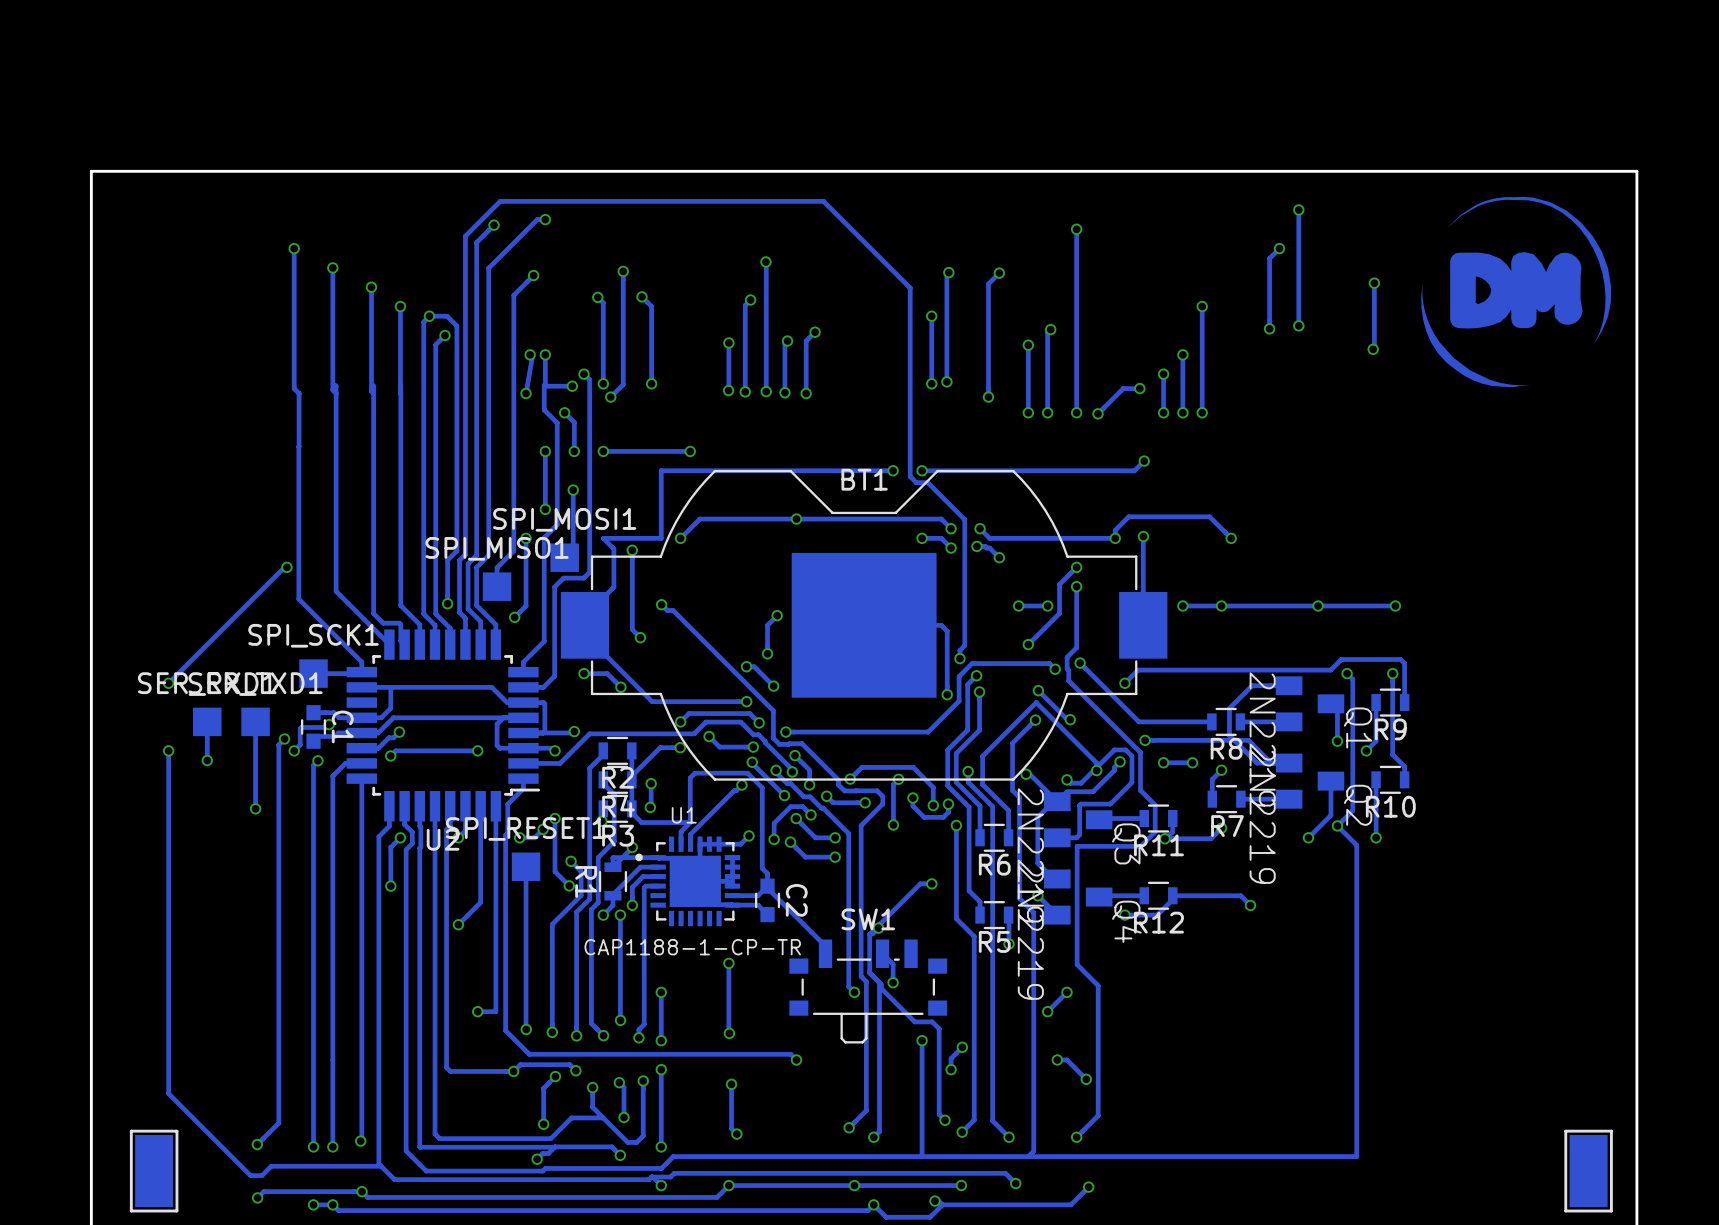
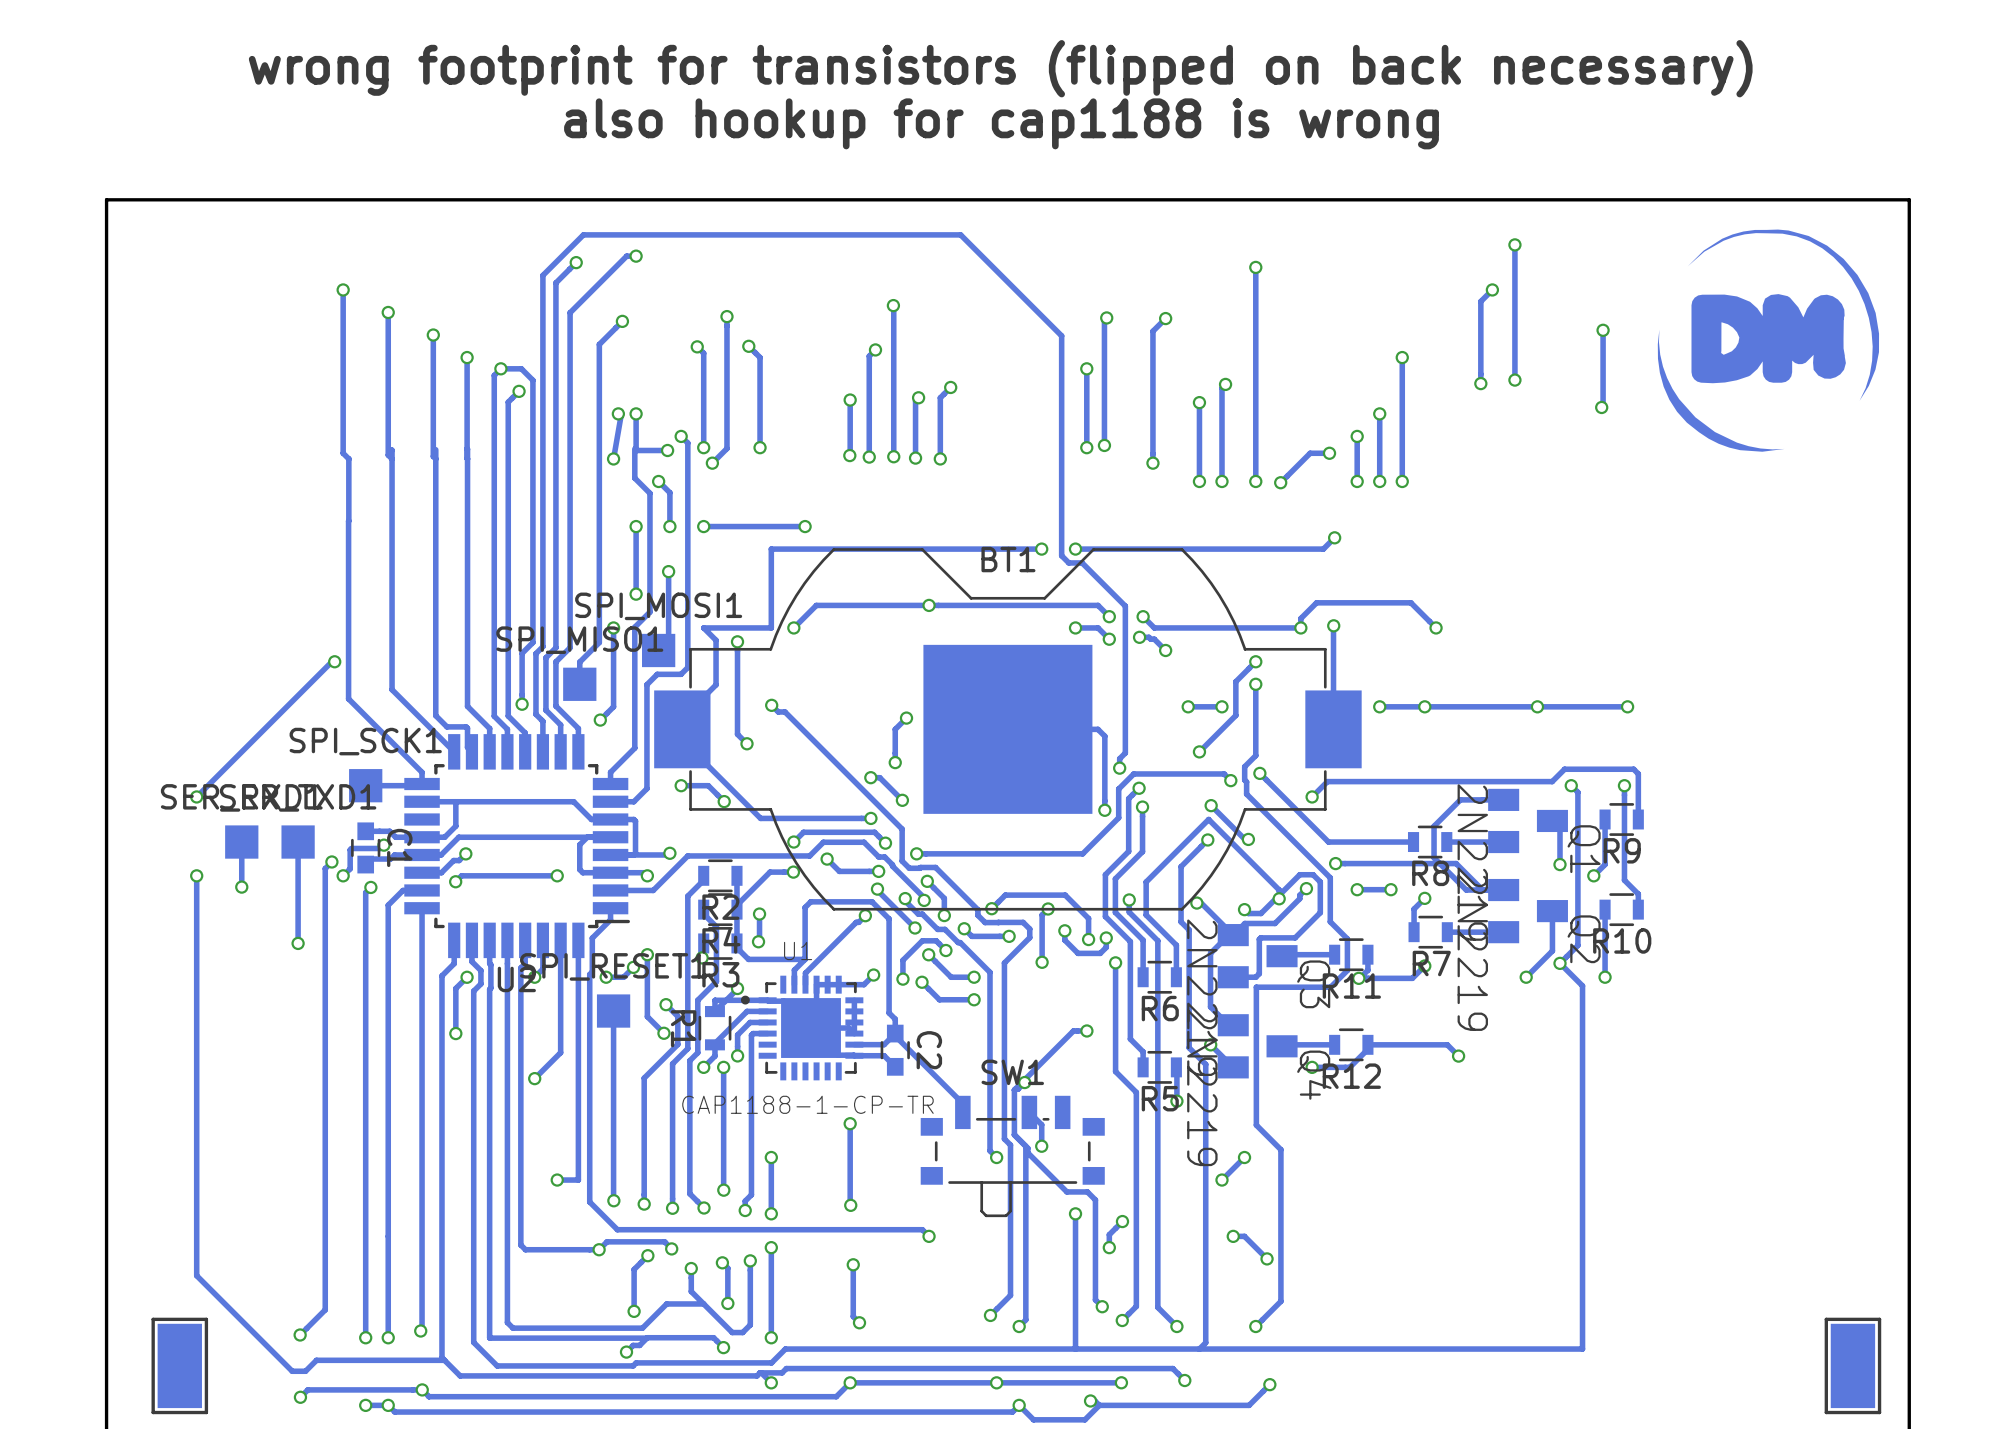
text: none -> wrong footprint for transistors (flipped on back necessary) (1000, 68)
text: none -> also hookup for cap1188 is wrong (1001, 123)

